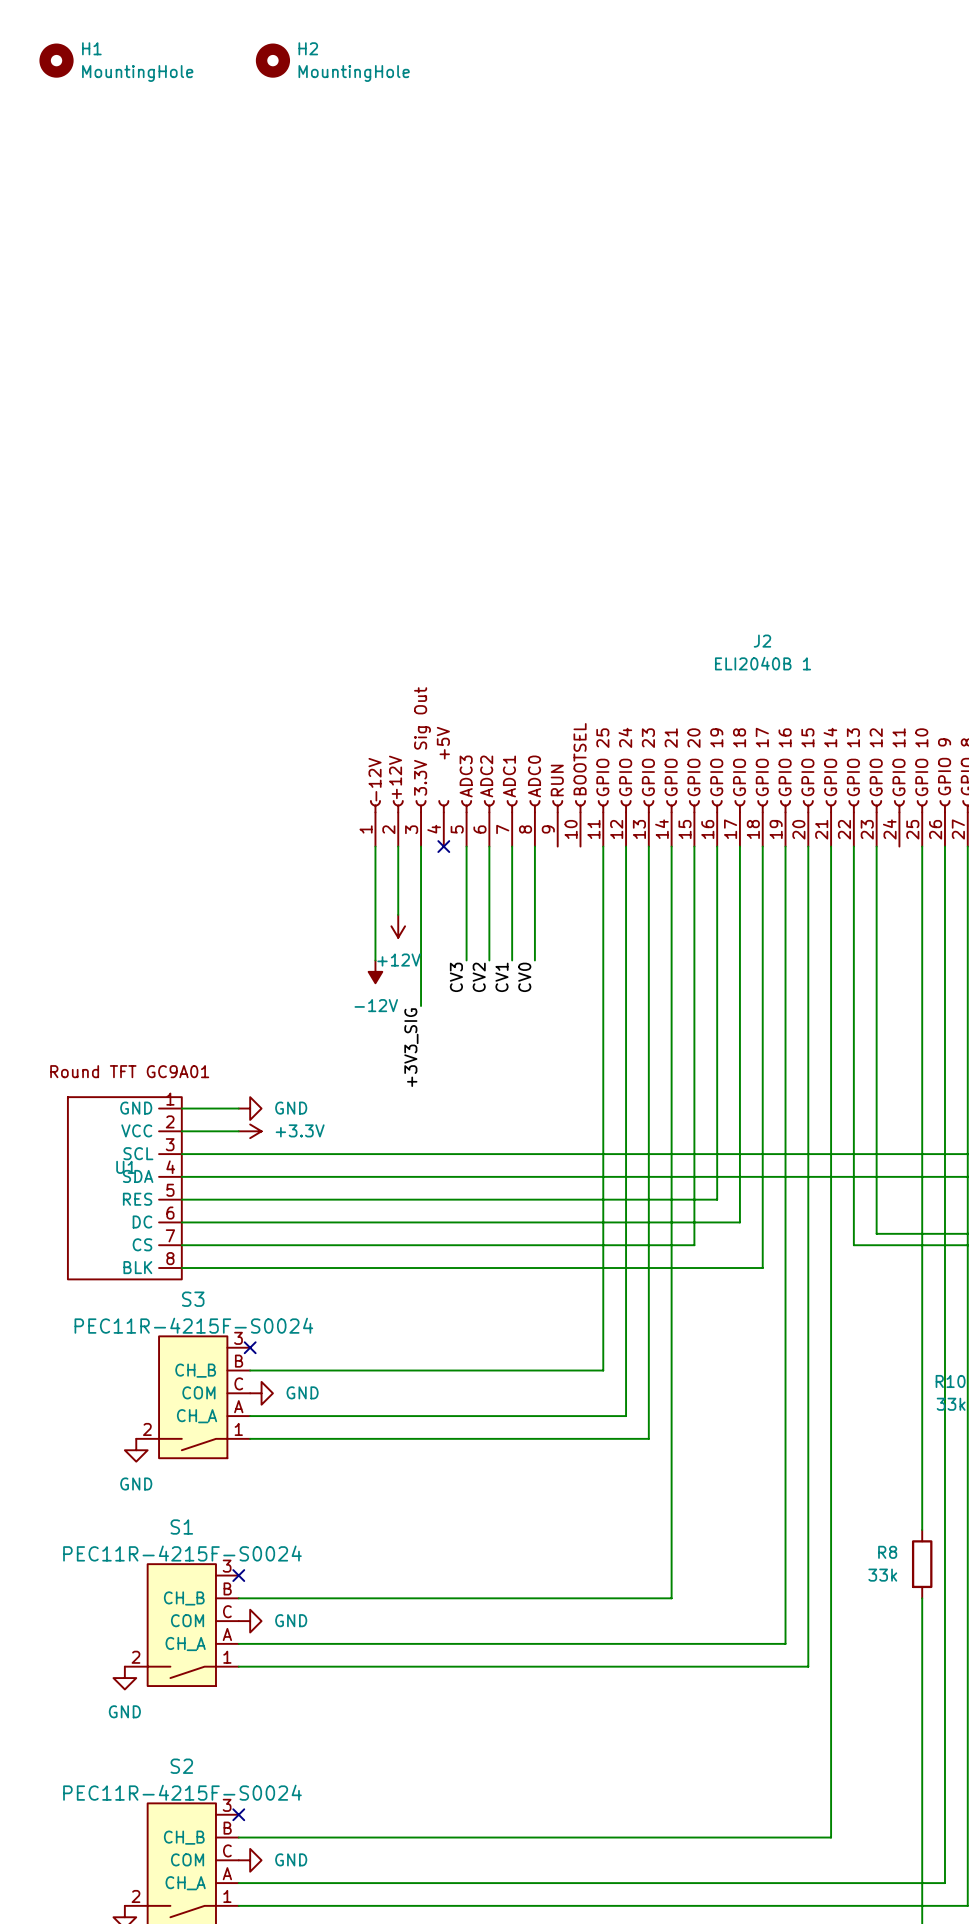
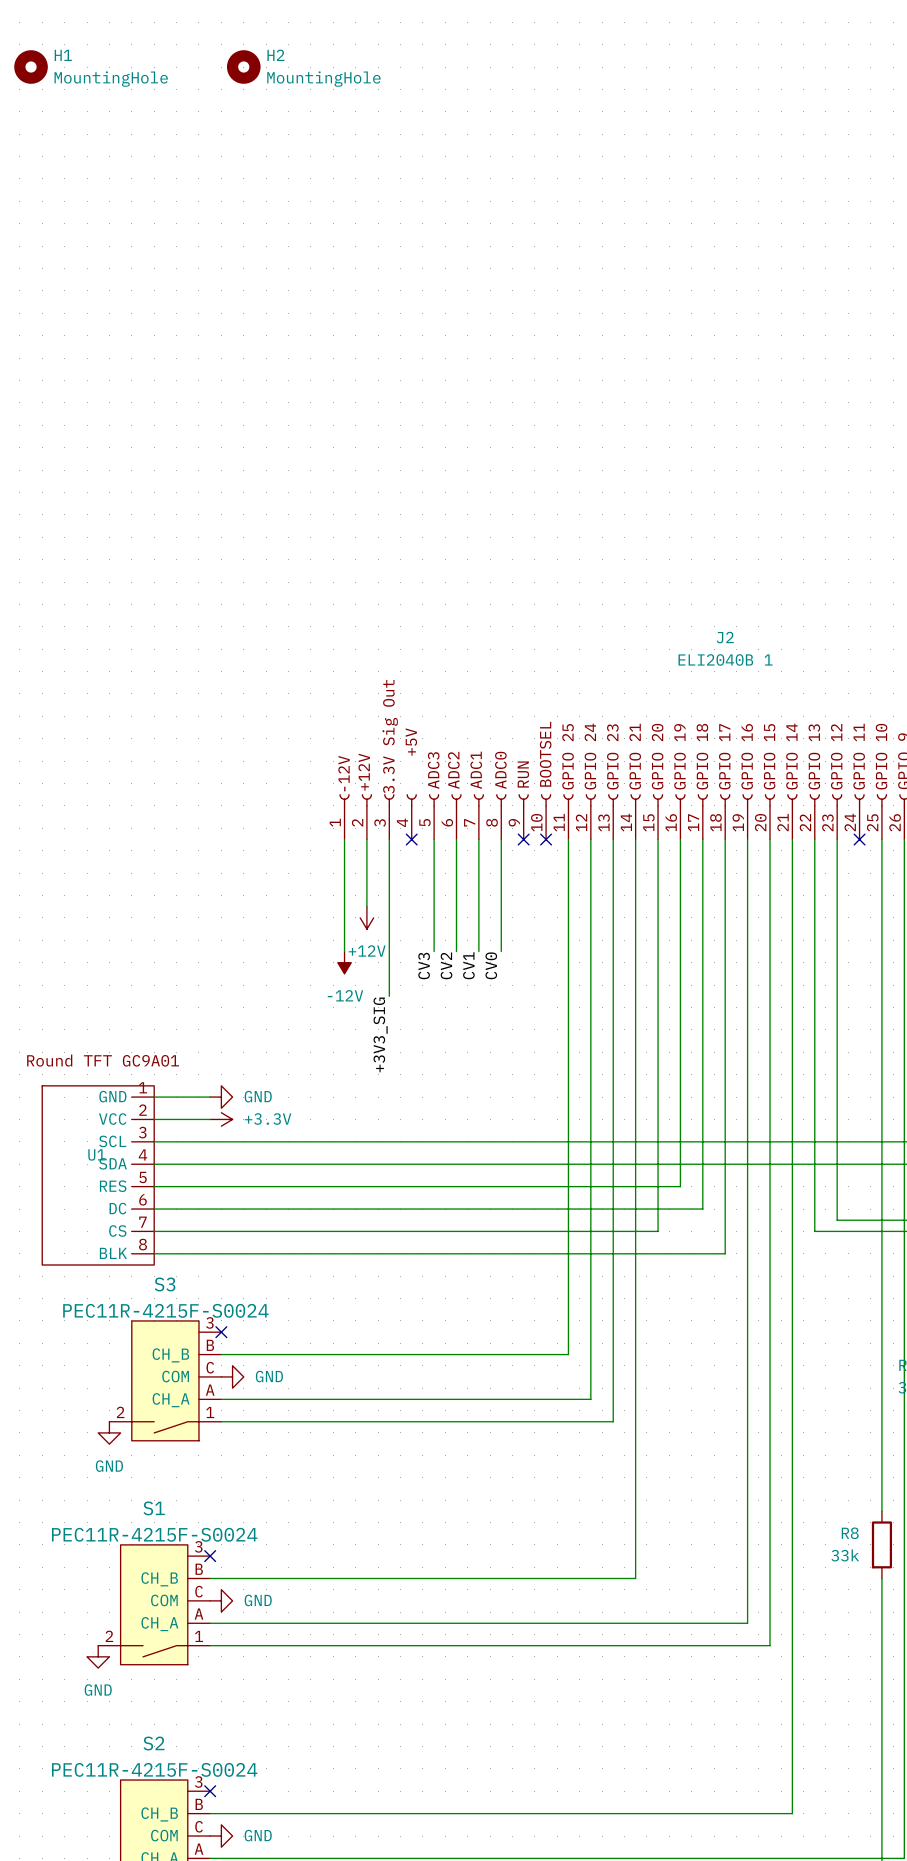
no-connect mark: none -> (523, 839)
no-connect mark: none -> (546, 839)
no-connect mark: none -> (859, 839)

